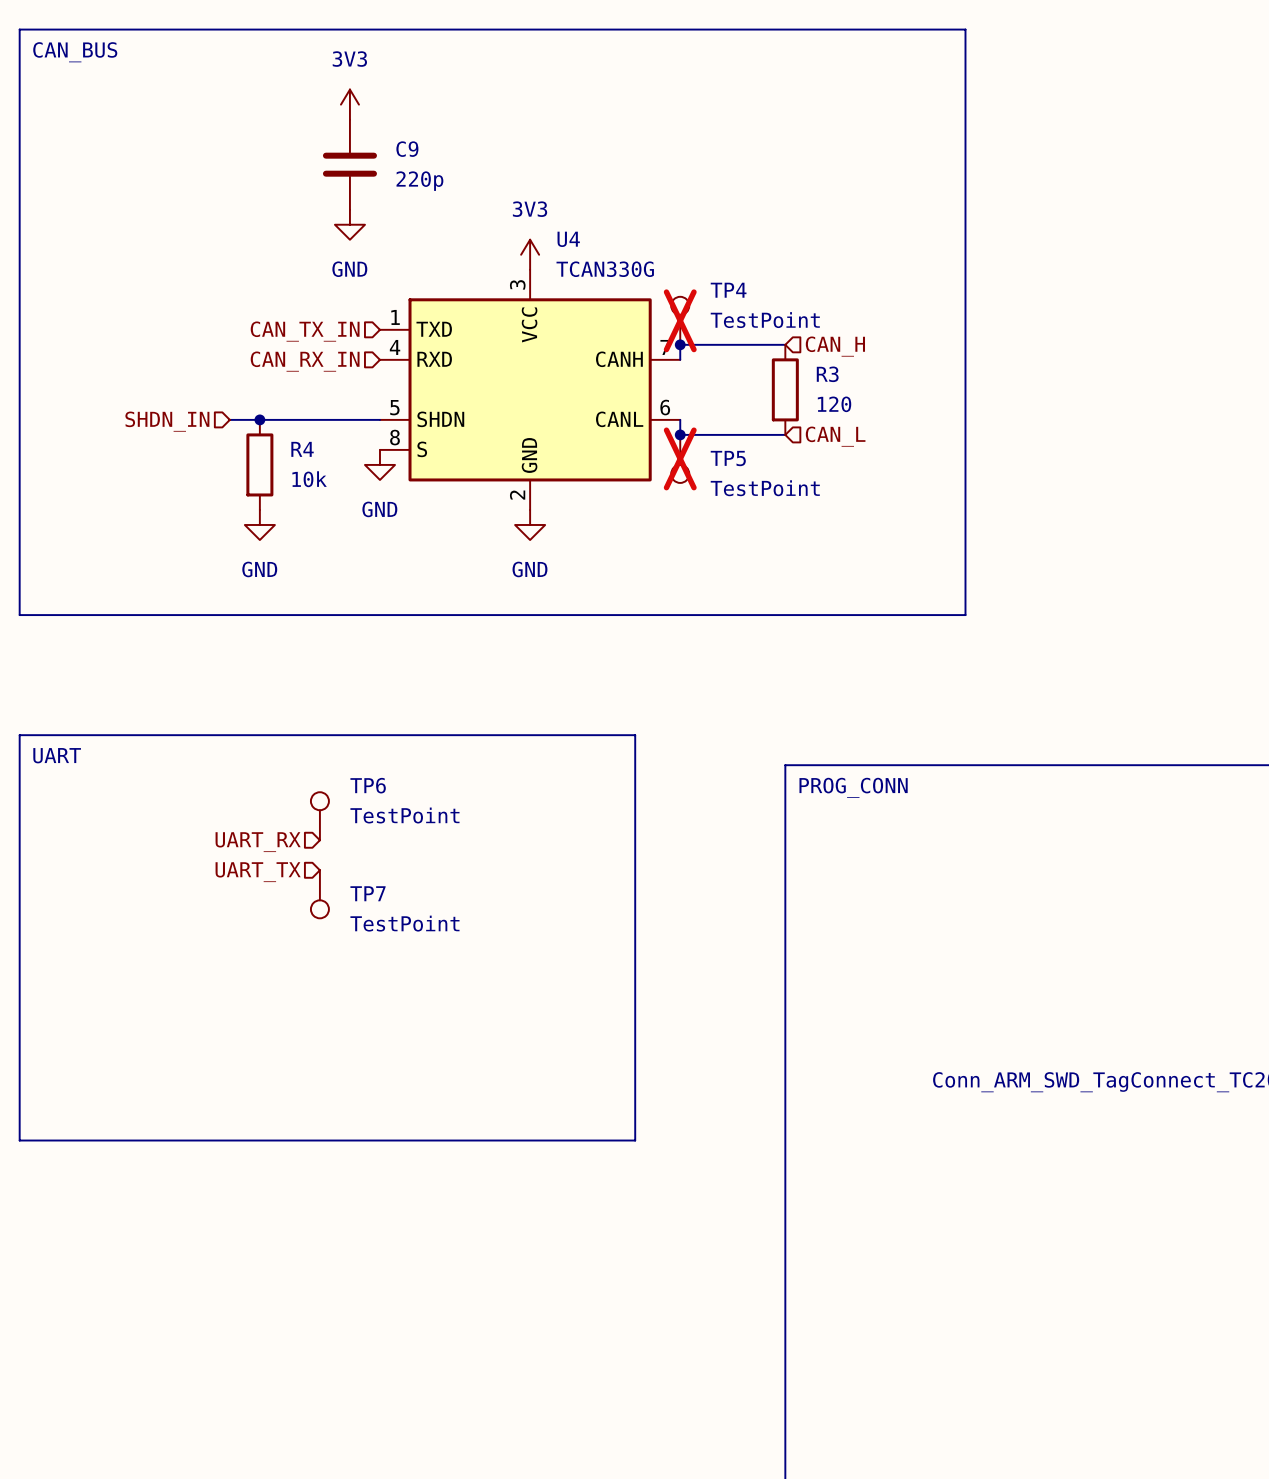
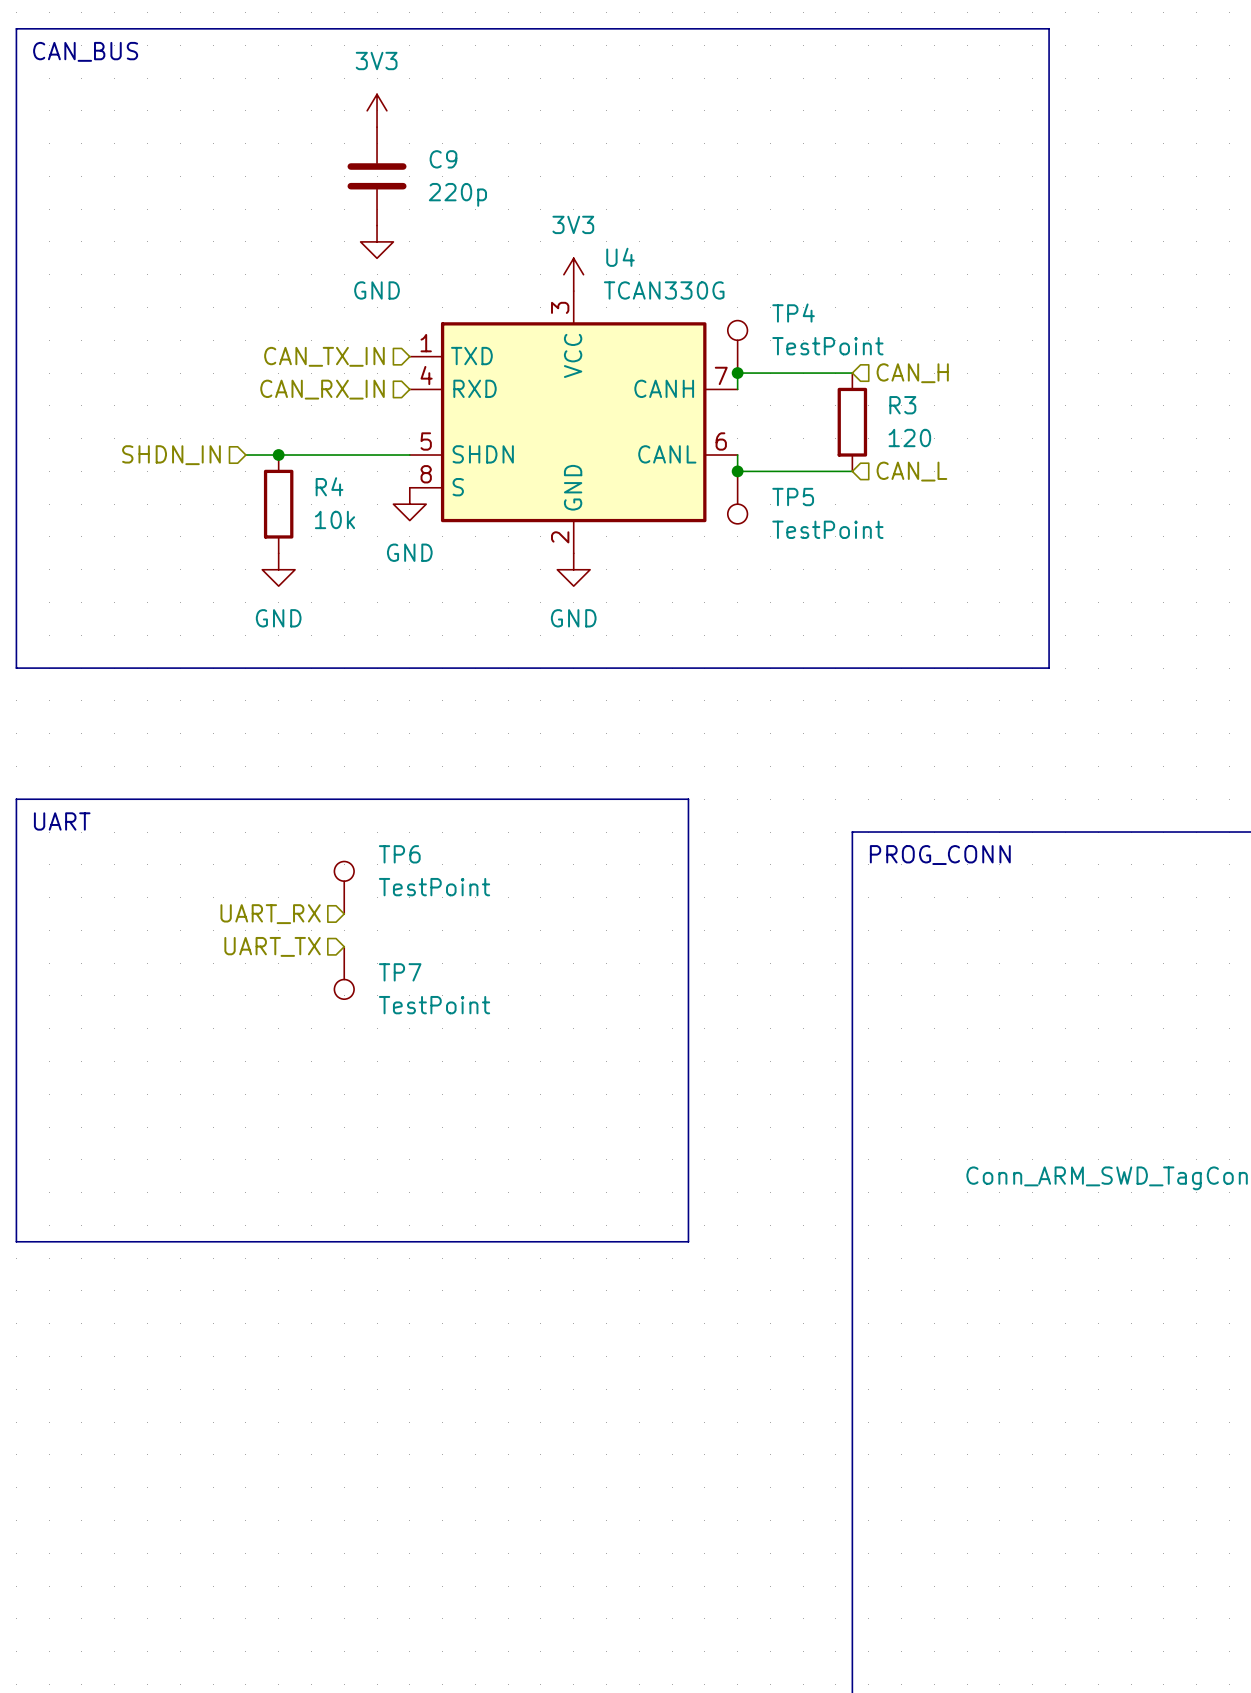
TP4 do-not-place cross: (680, 320) -> none
TP5 do-not-place cross: (680, 458) -> none

